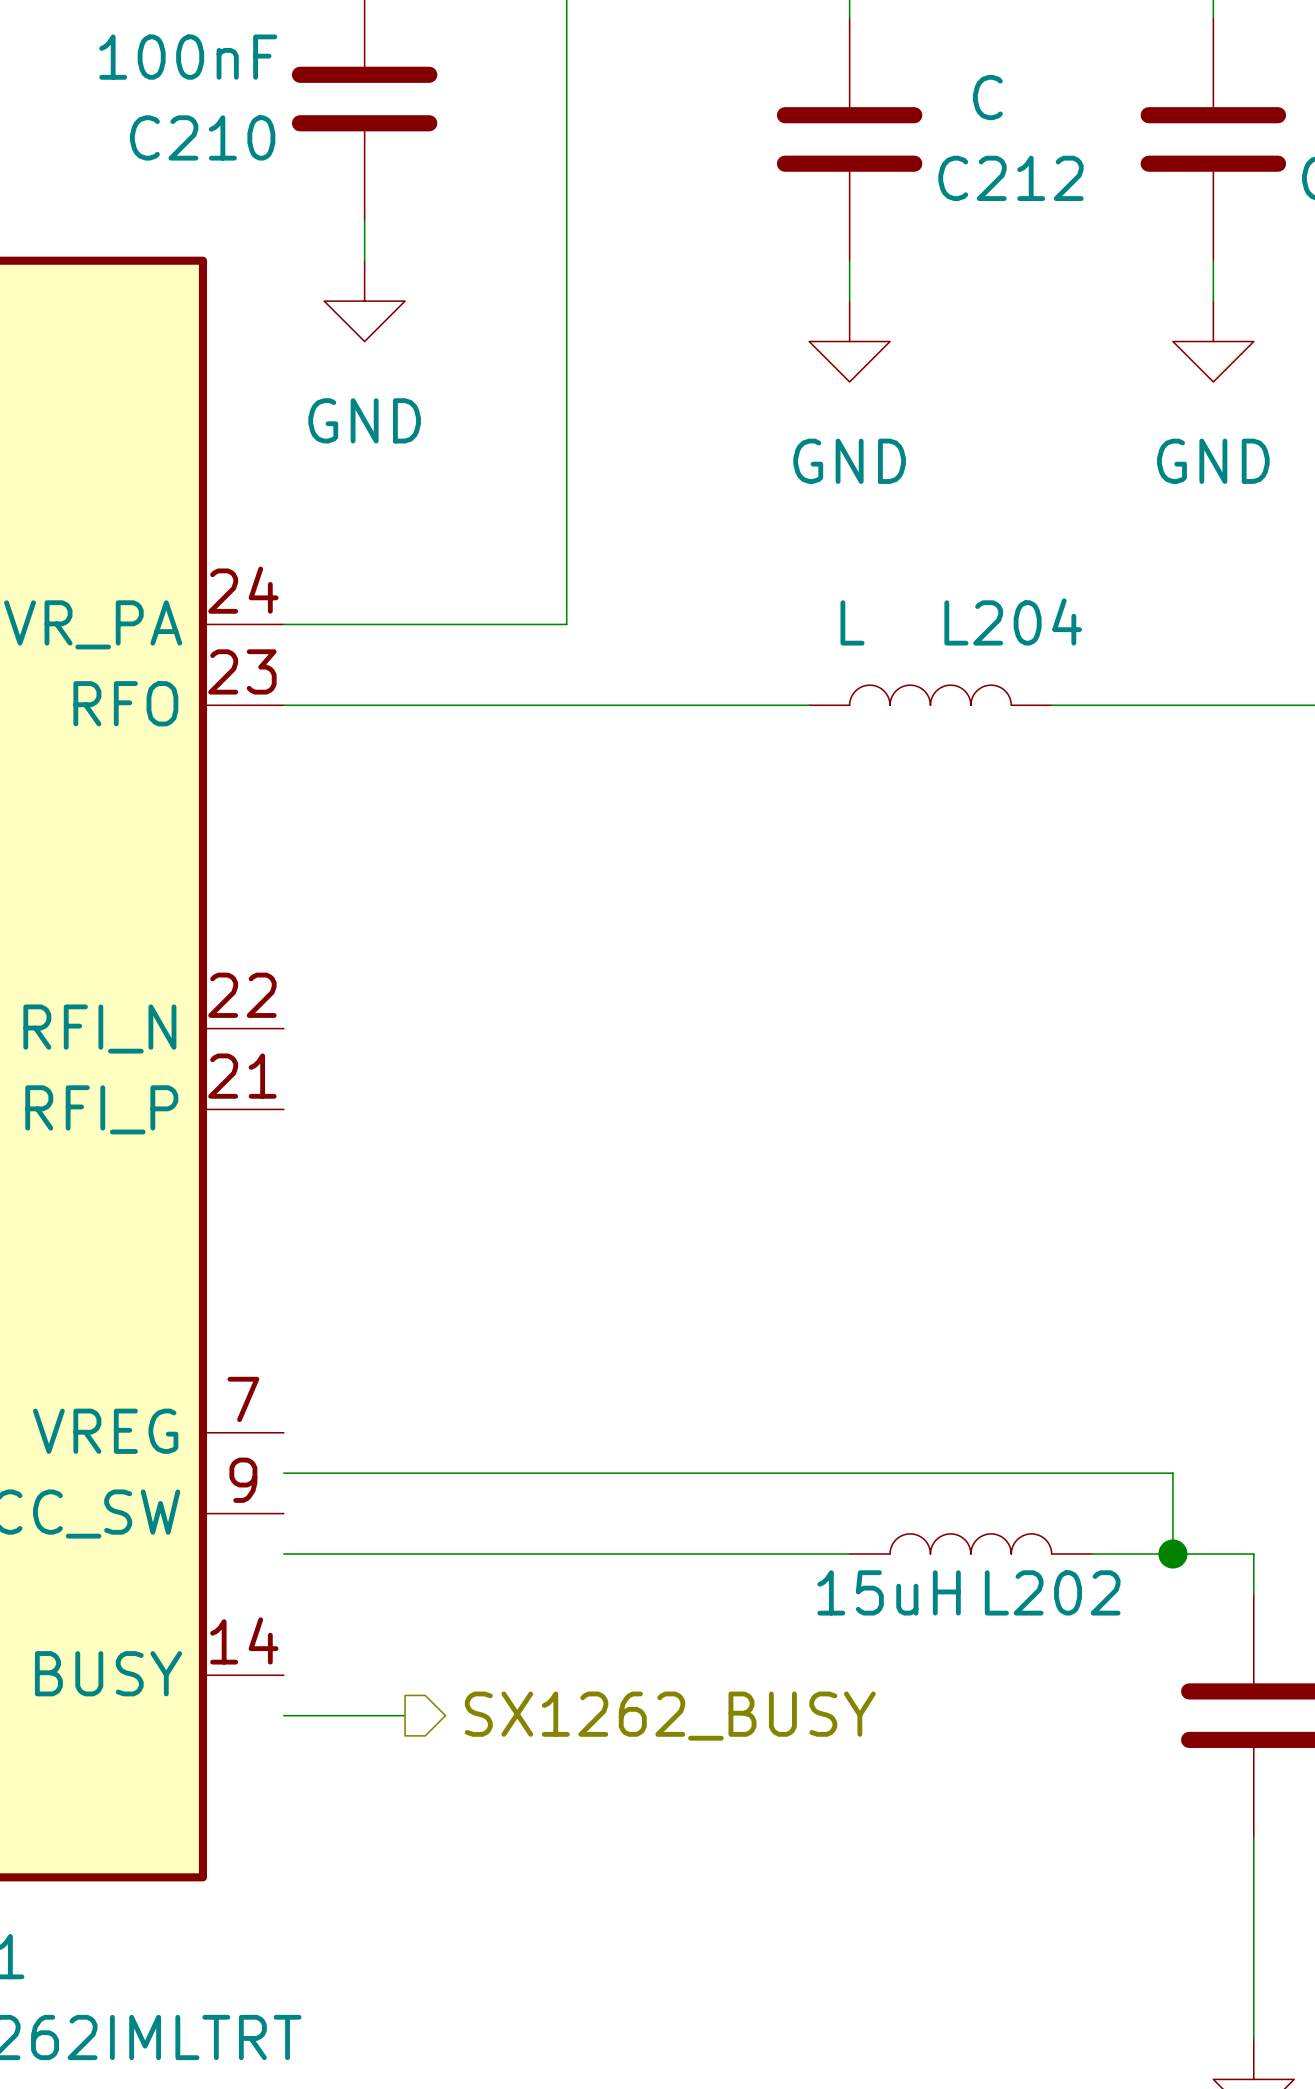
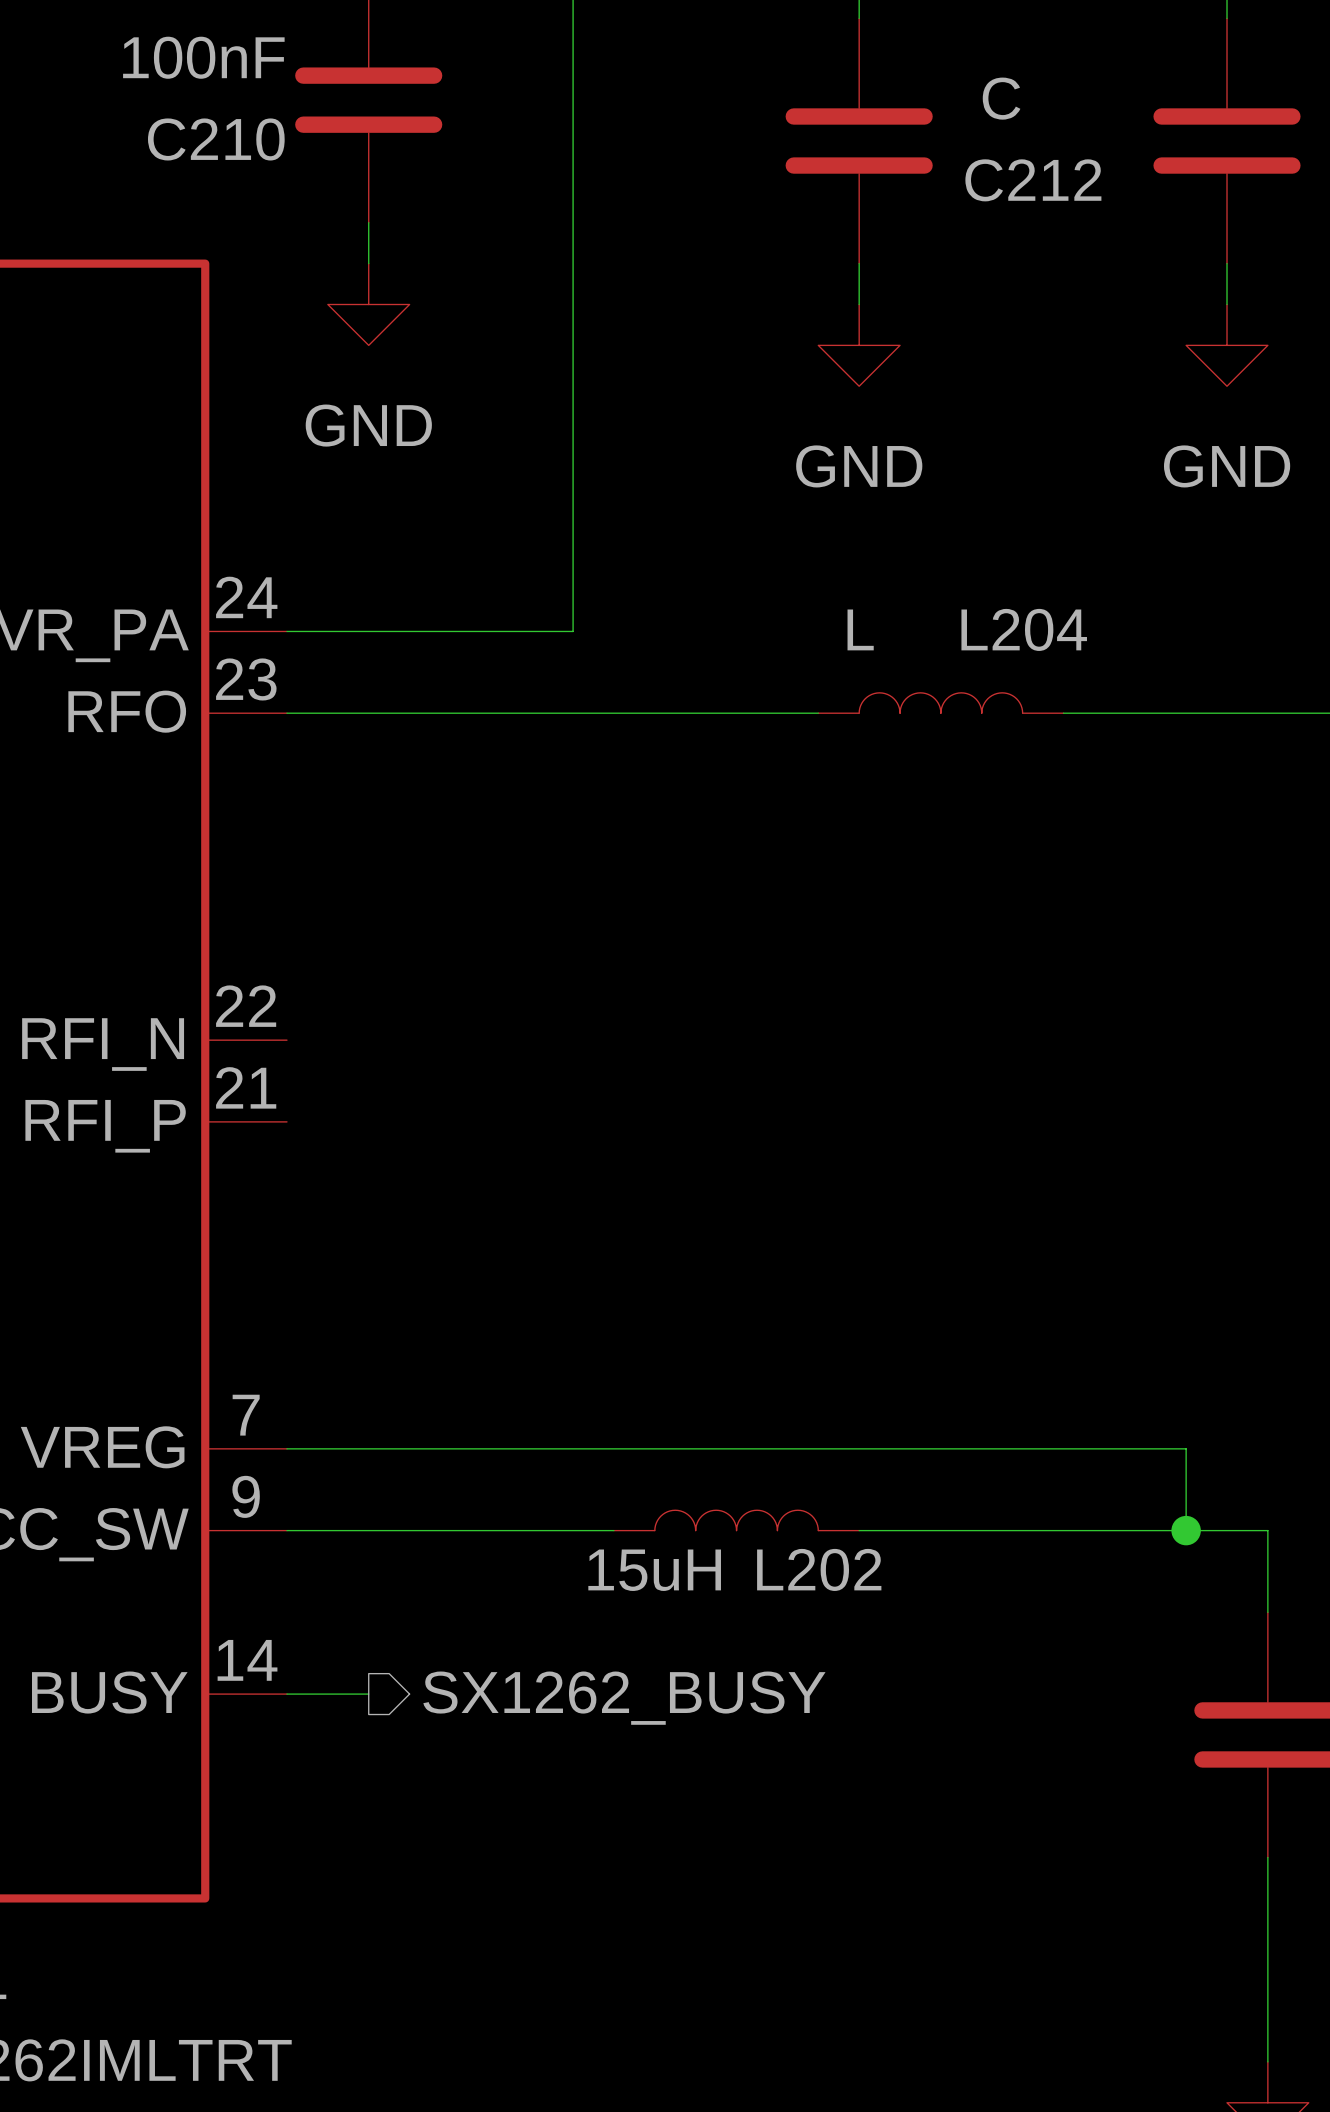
wire: (283, 1473) (1172, 1473) -> (286, 1448) (1186, 1448) (1186, 1489)
wire: none -> (286, 1530) (613, 1530)
wire: (1172, 1513) (1172, 1554) -> none
L202 position: (970, 1543) -> (736, 1520)
wire: (283, 1554) (849, 1554) -> none
wire: (1092, 1554) (1253, 1554) -> (859, 1530) (1267, 1530) (1267, 1571)
junction position: (1172, 1554) -> (1186, 1530)
wire: none -> (286, 1694) (368, 1694)
wire: (283, 1715) (405, 1715) -> none
hierarchical label position: SX1262_BUSY (670, 1716) -> SX1262_BUSY (624, 1698)

